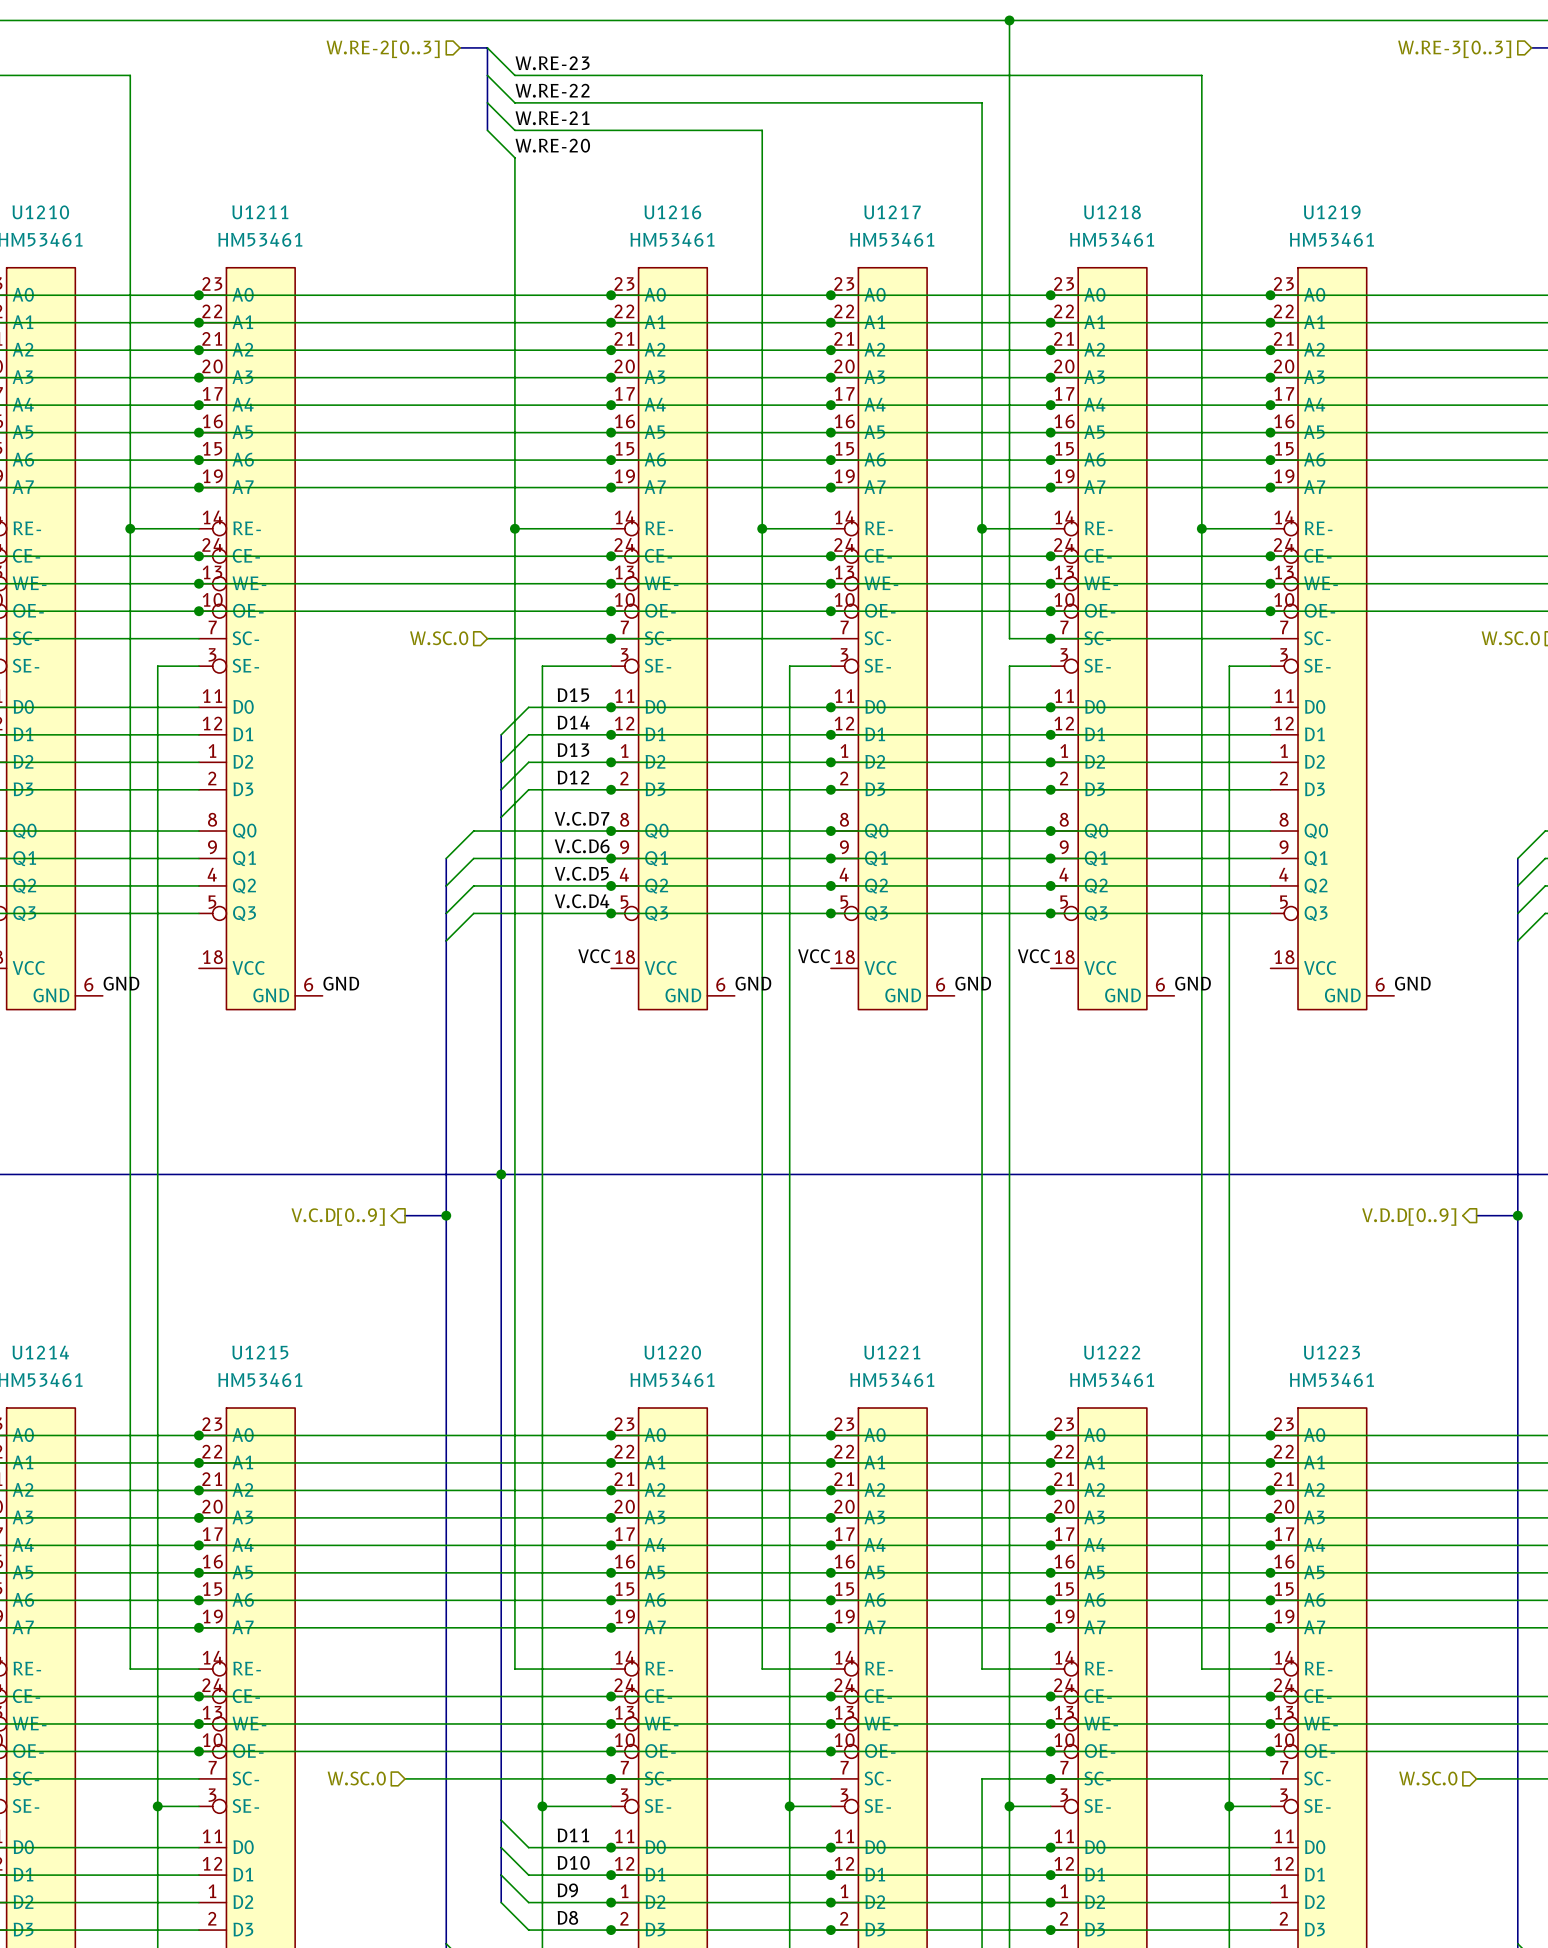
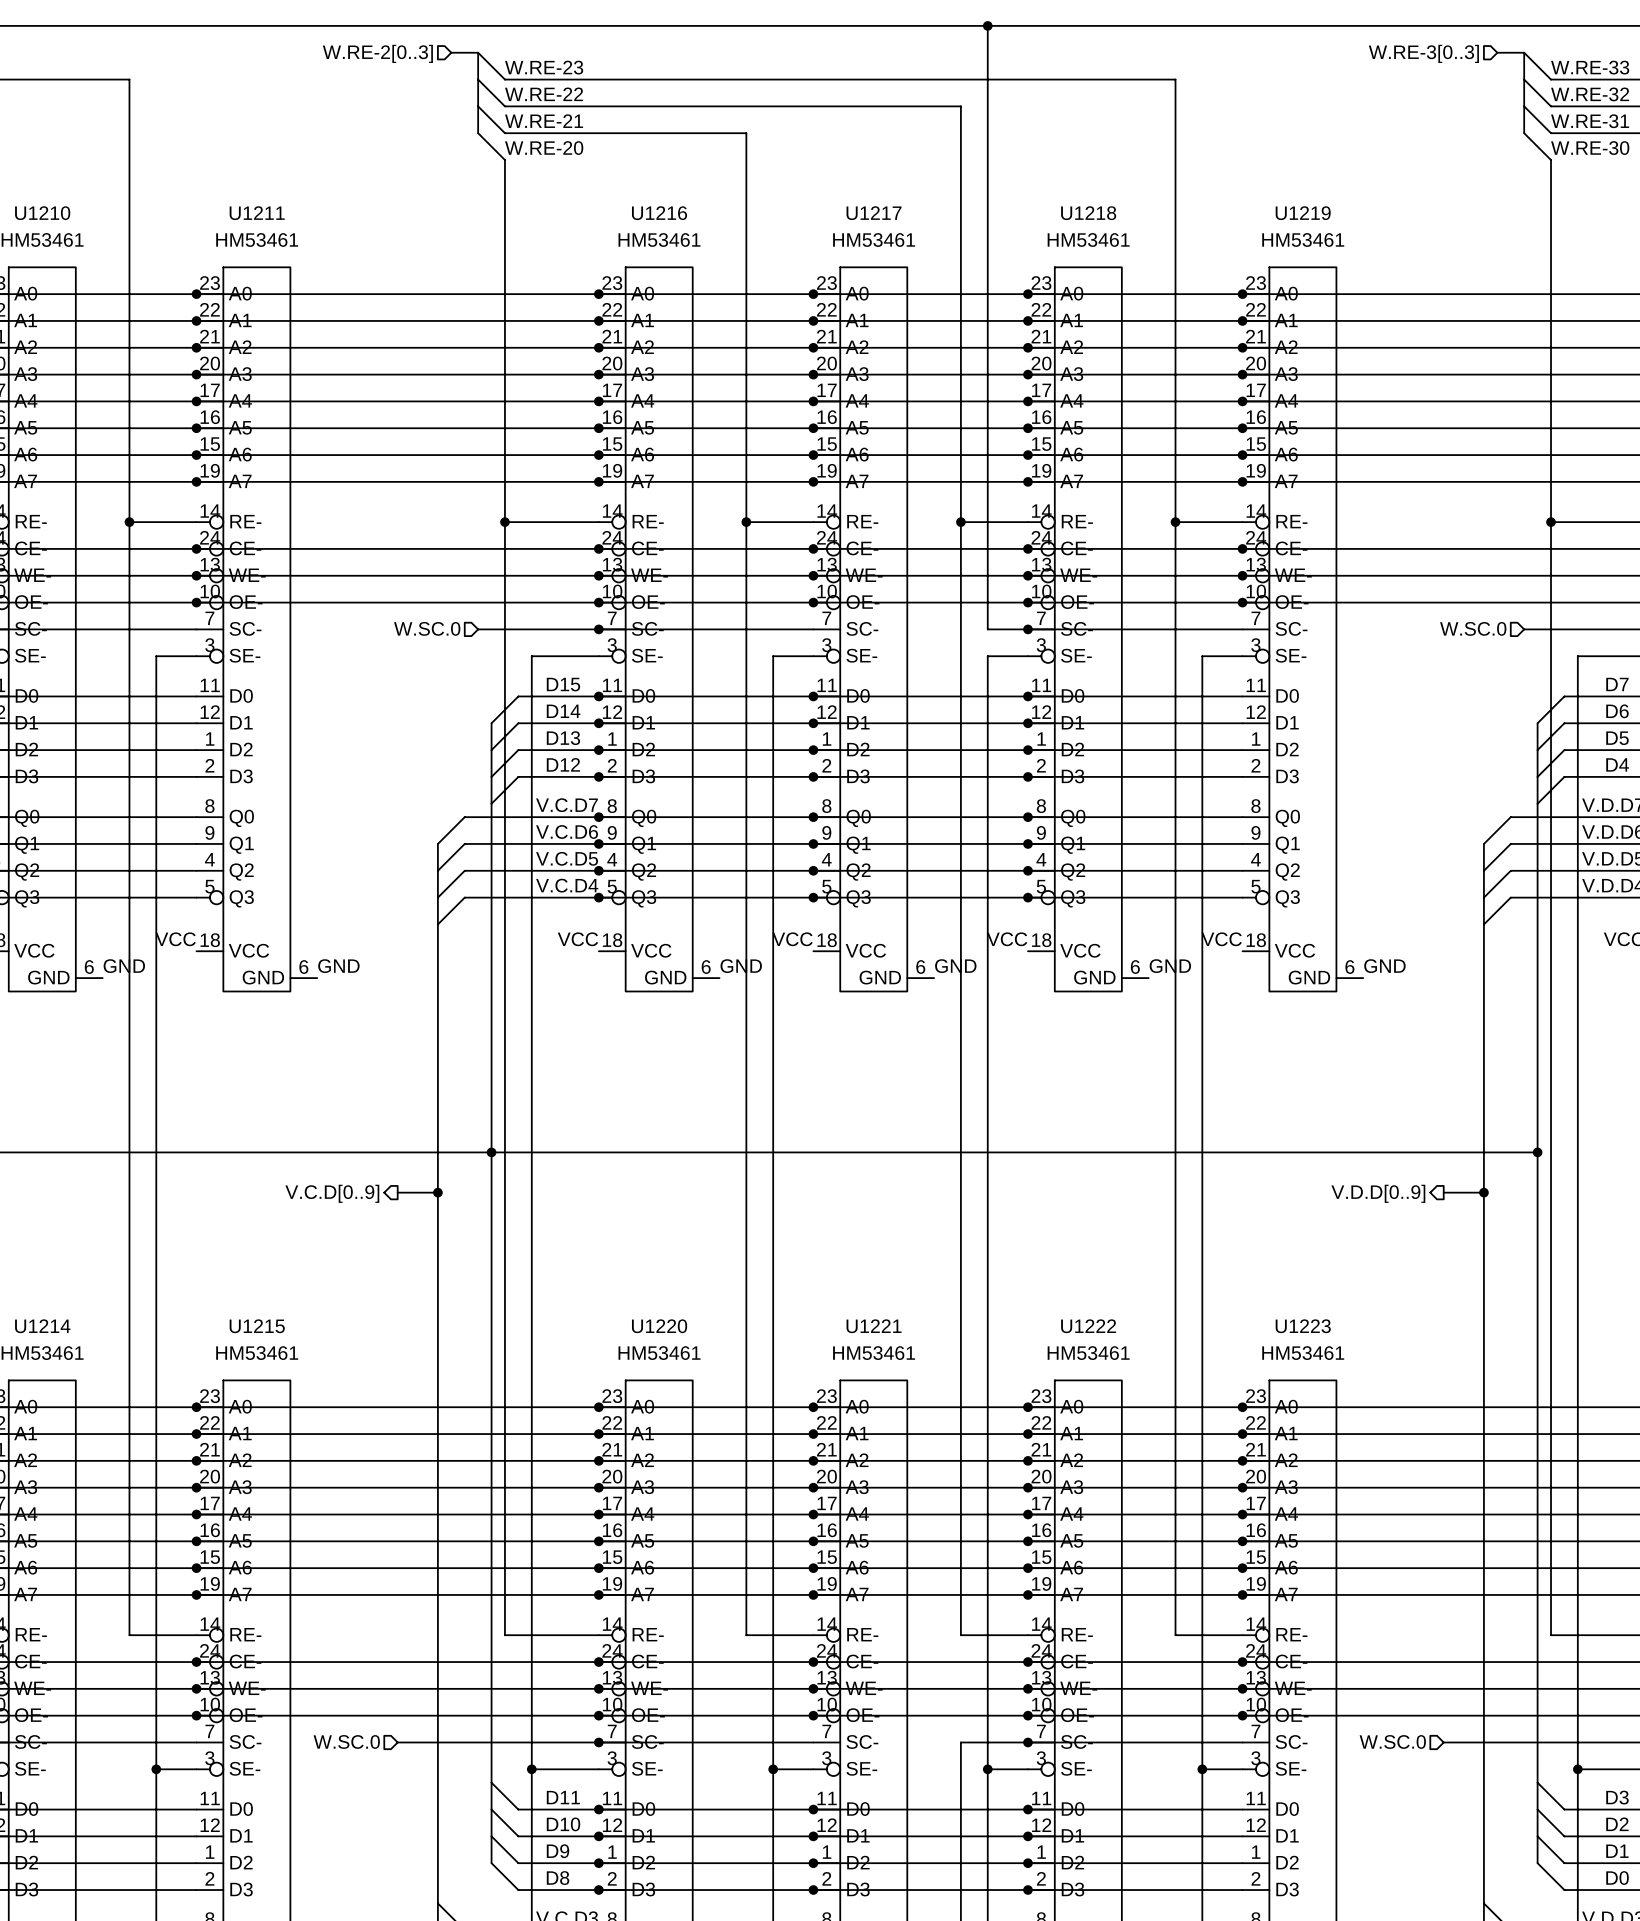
label: none -> VCC (175, 939)
label: none -> VCC (1221, 939)

